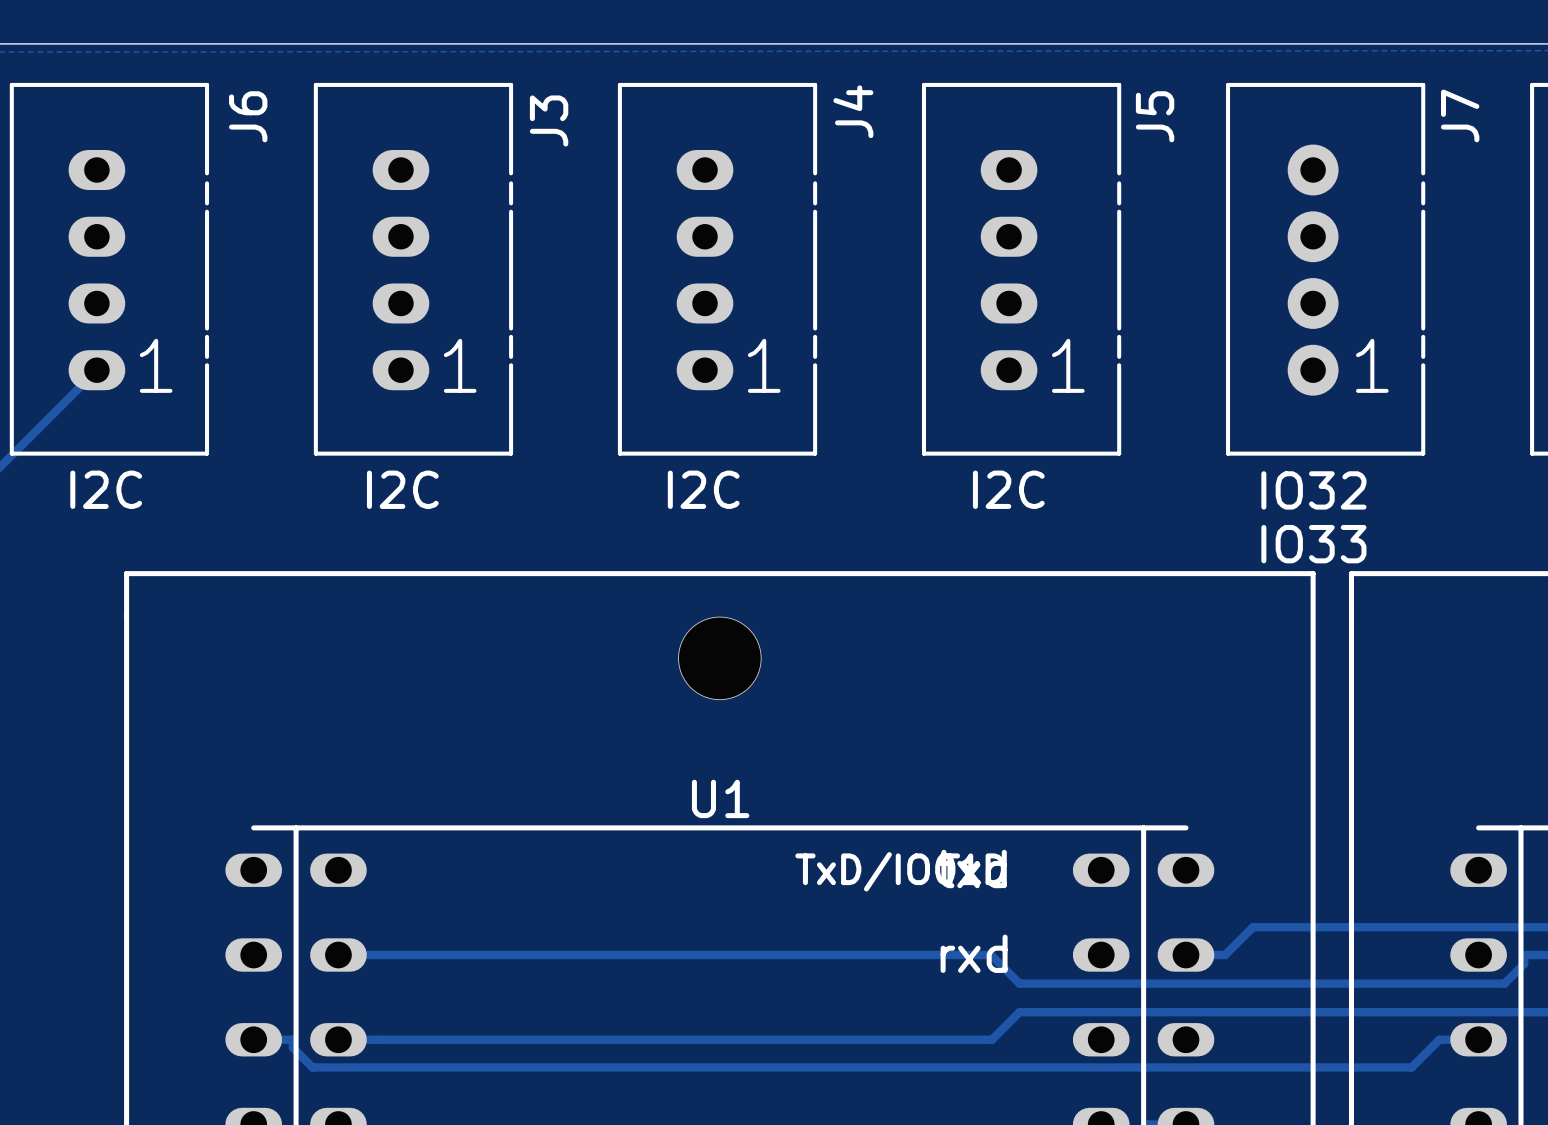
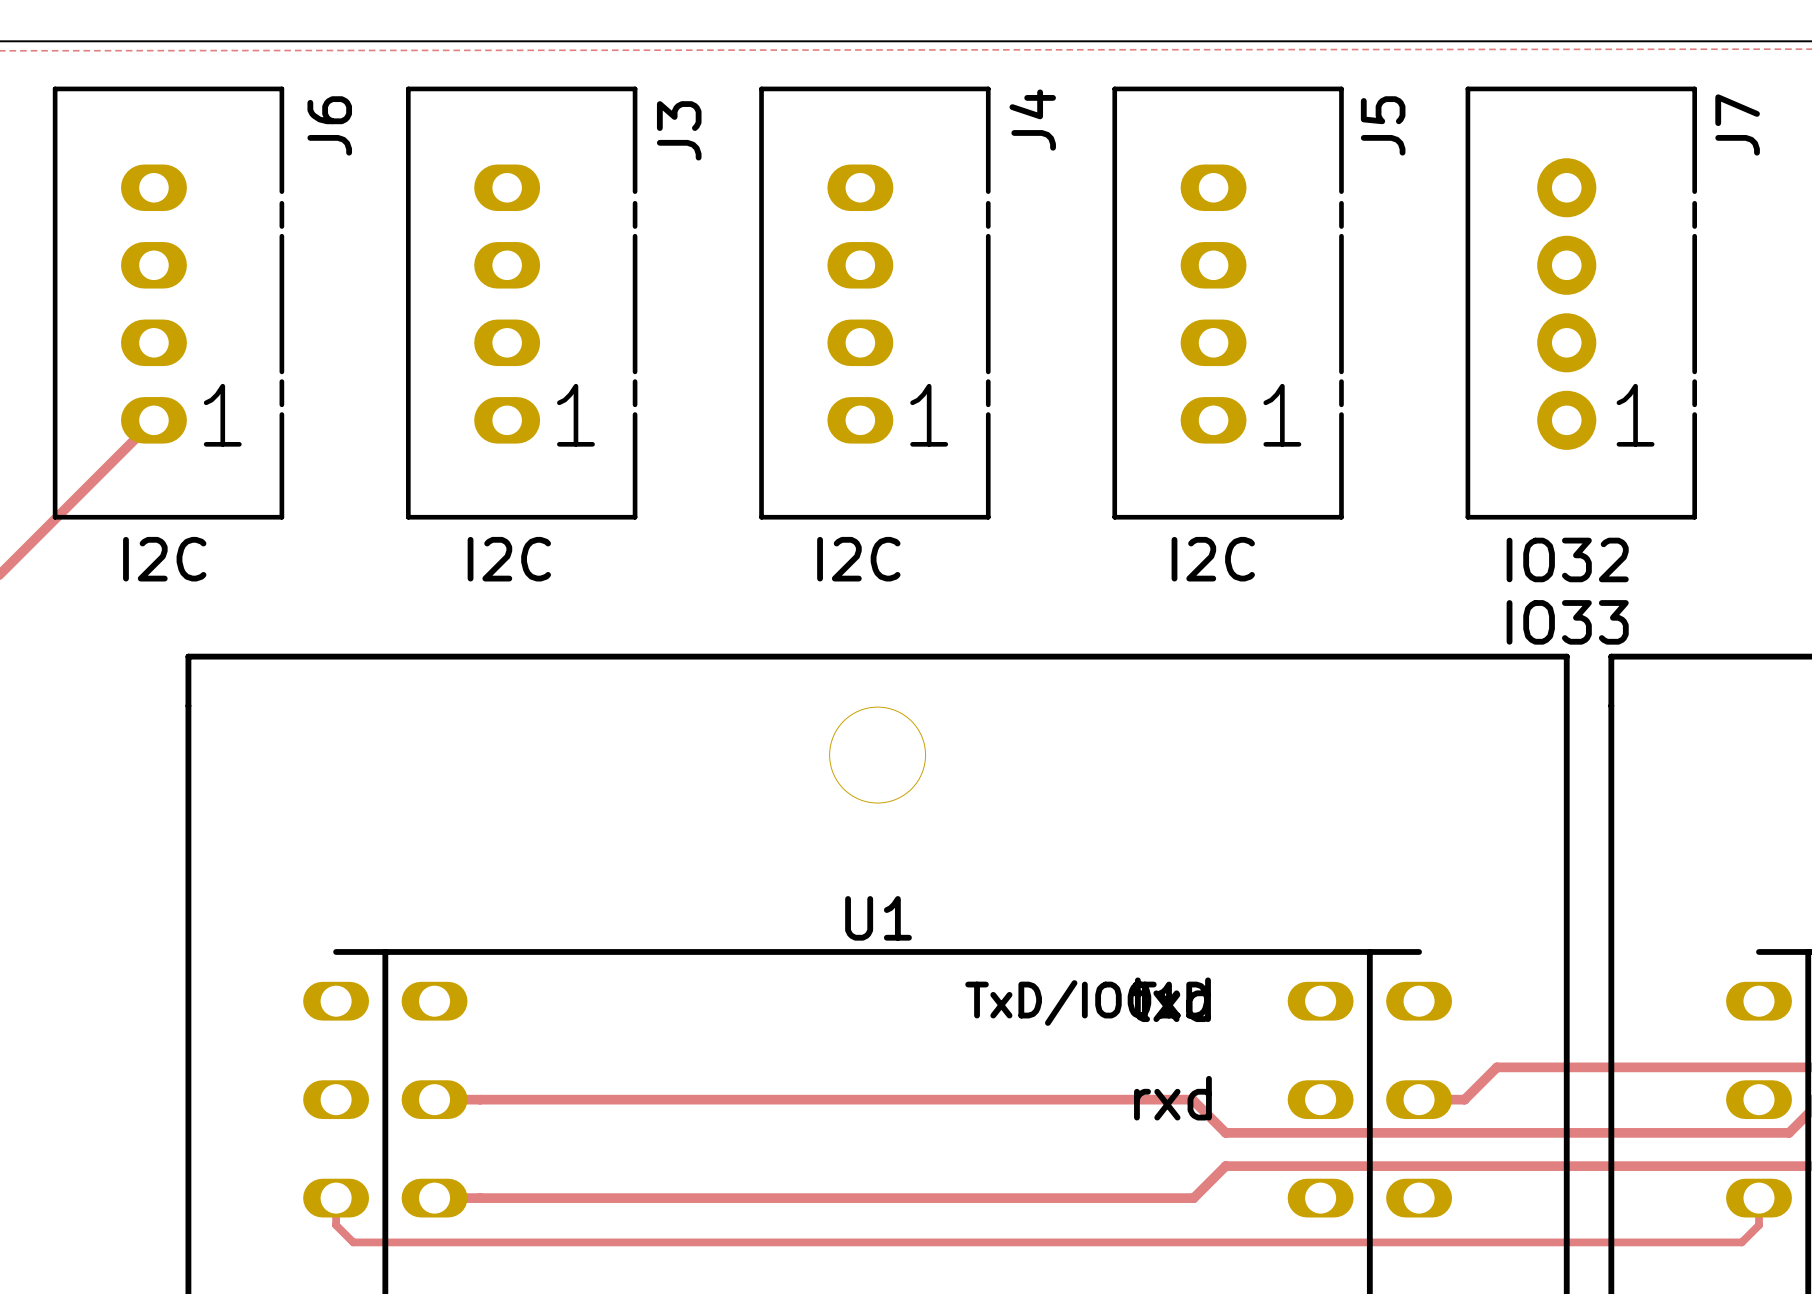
track: (253, 1039) (292, 1039) (292, 1047) (312, 1067) (1411, 1067) (1439, 1039) (1478, 1039) -> (336, 1198) (336, 1225) (353, 1242) (1741, 1242) (1759, 1225) (1759, 1198)

